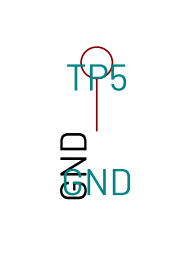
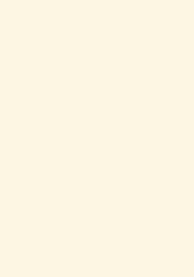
TP5: GND (96, 88) -> none
label: GND (73, 166) -> none

